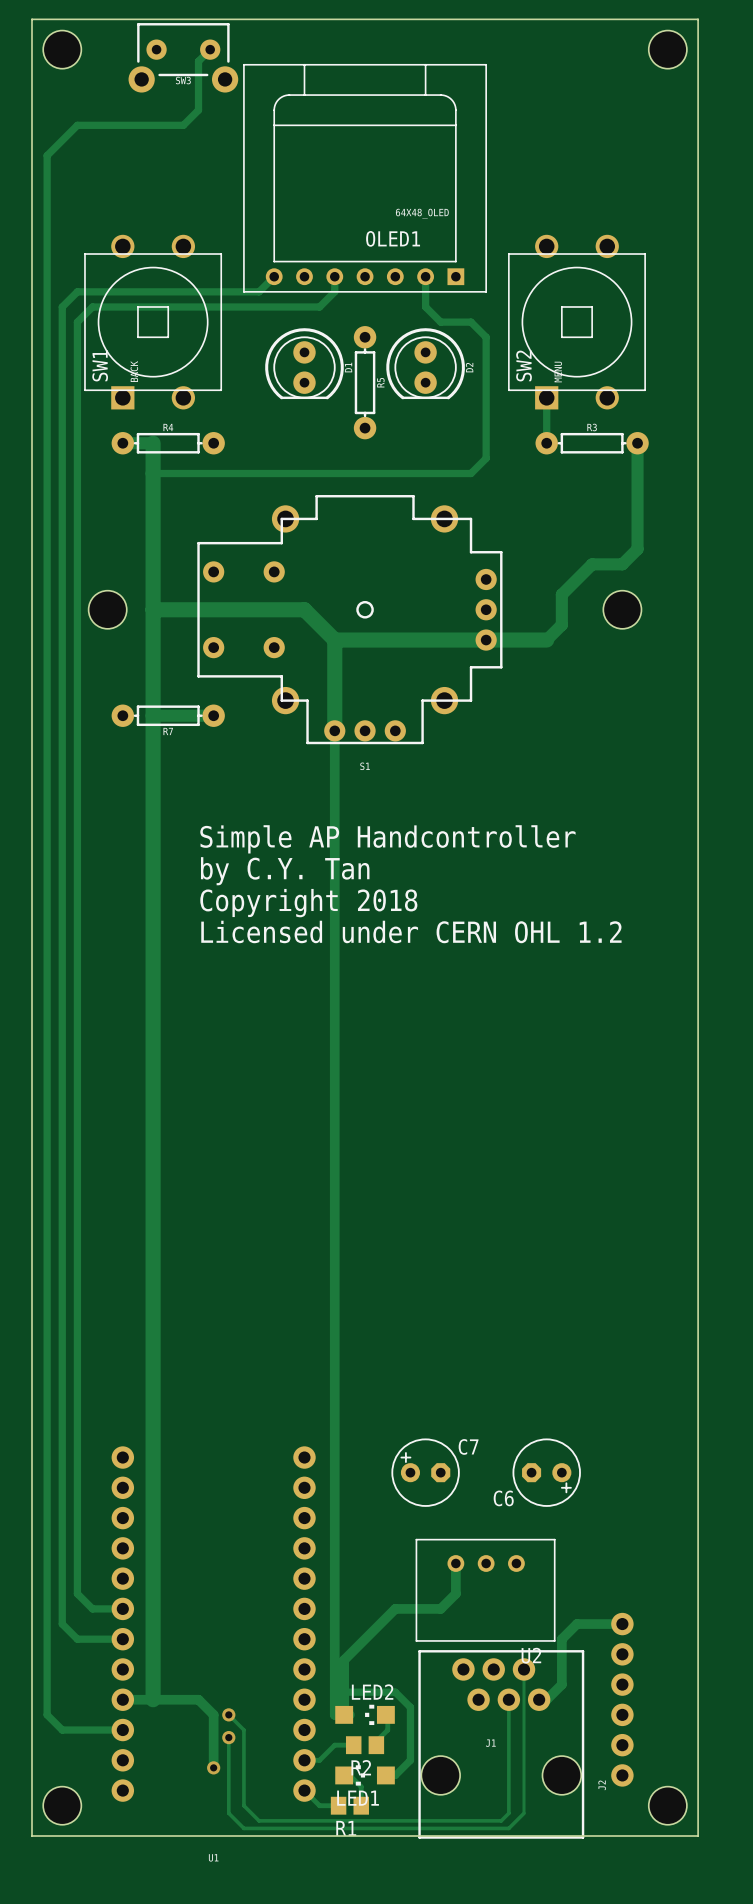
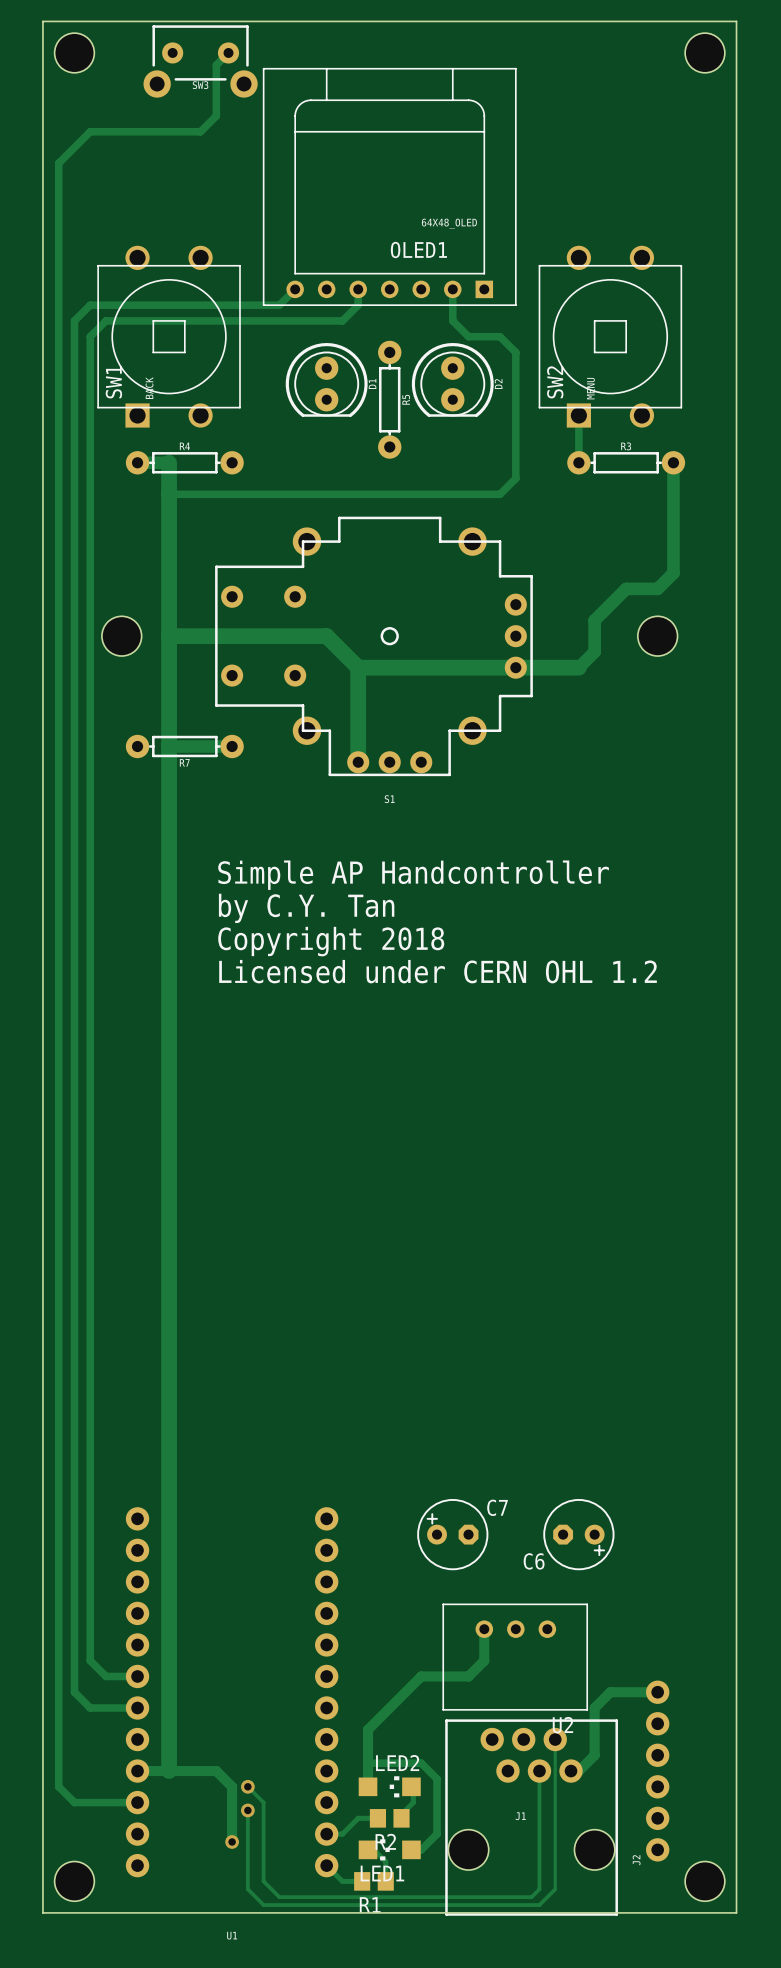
track: (334, 730) (334, 1714) (349, 1714) -> none

